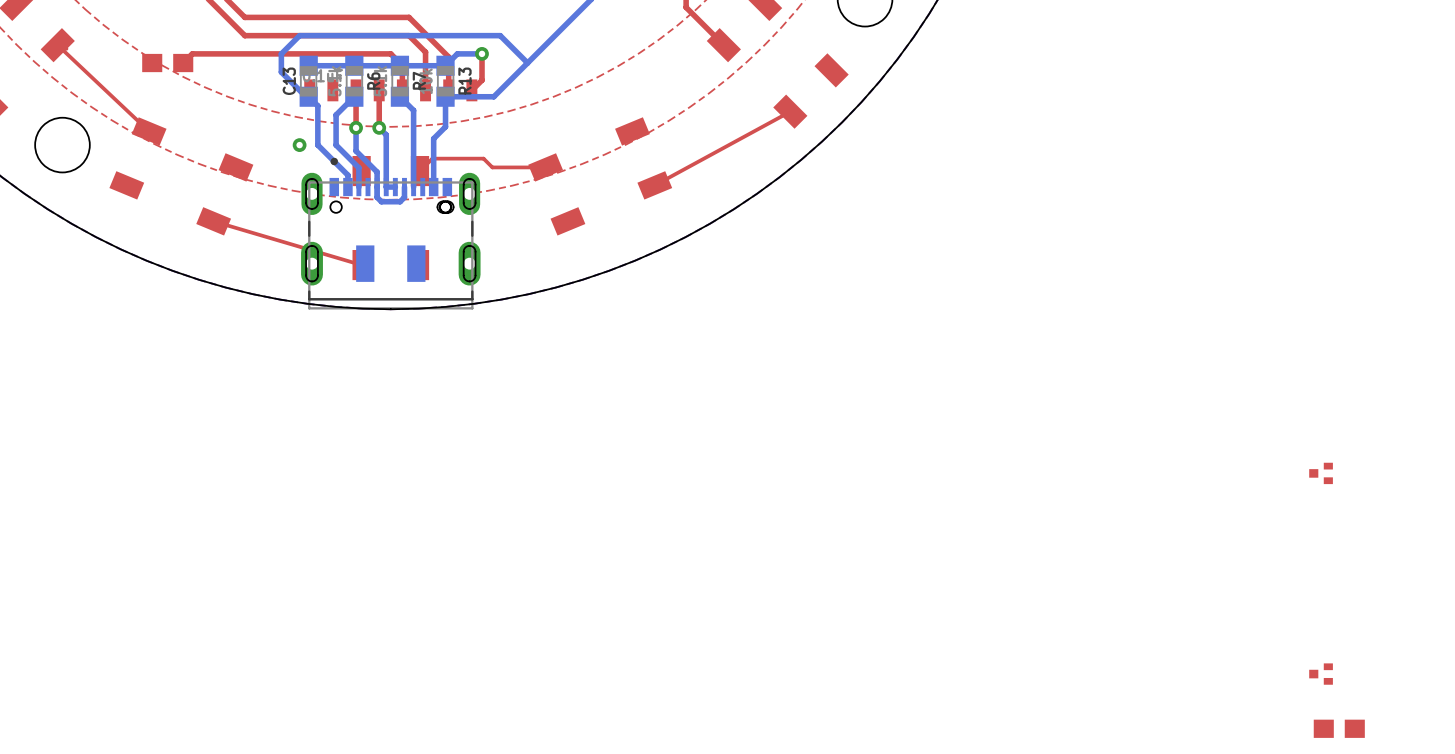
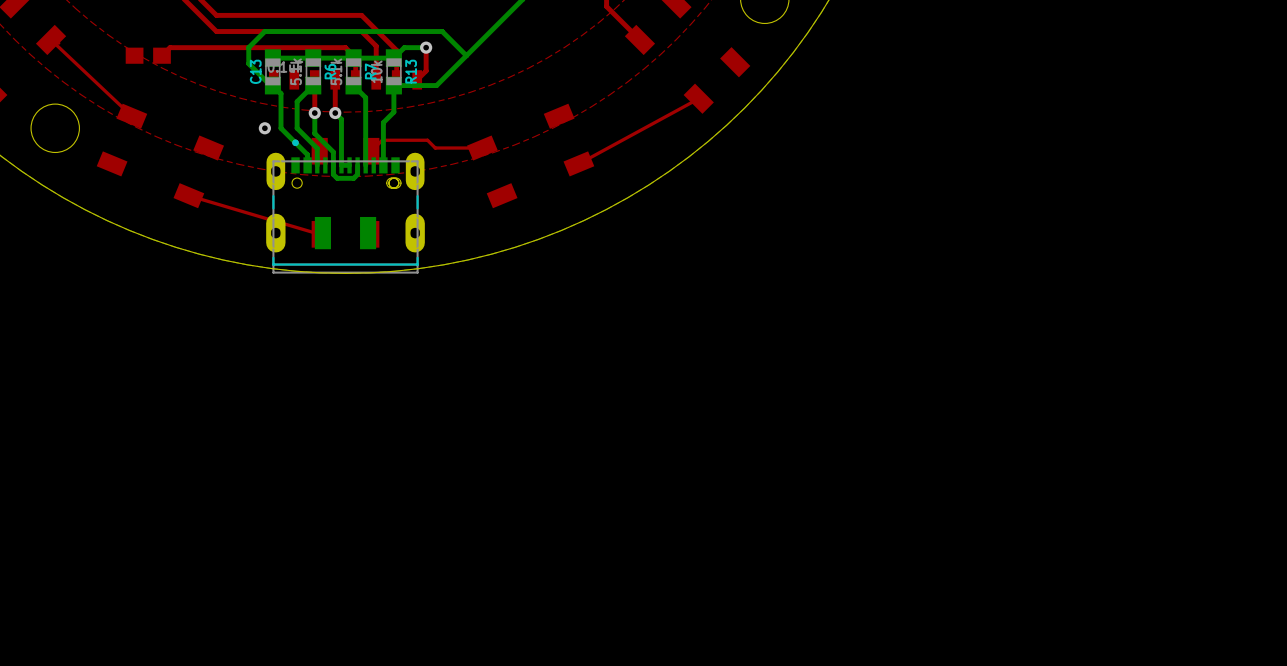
part: (1321, 473) -> none
part: (1321, 674) -> none
part: (1339, 728) -> none

